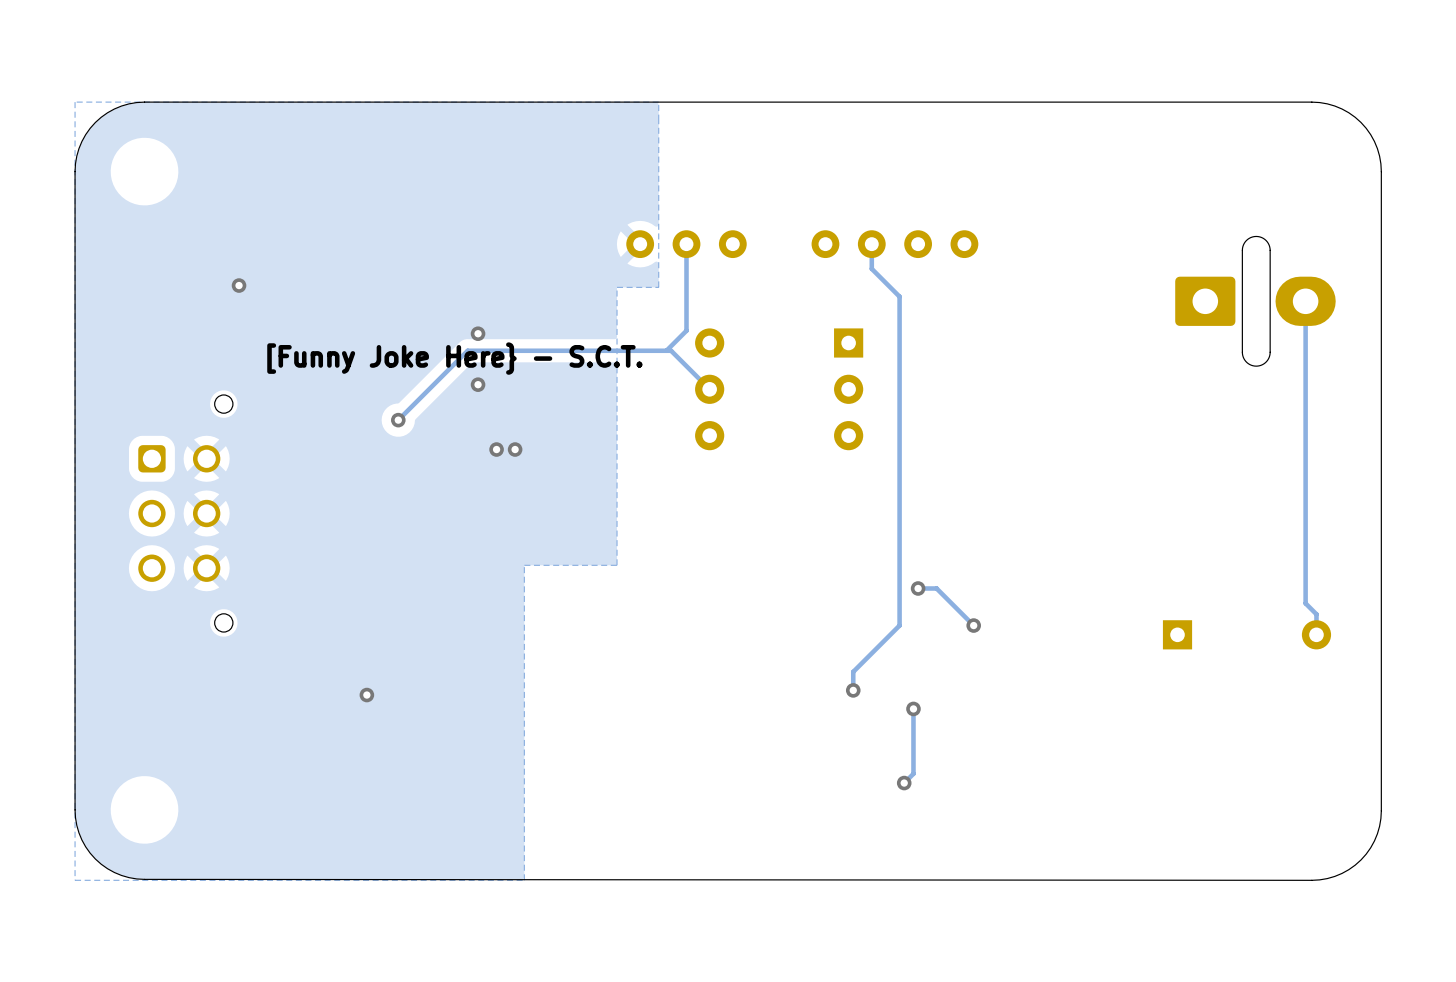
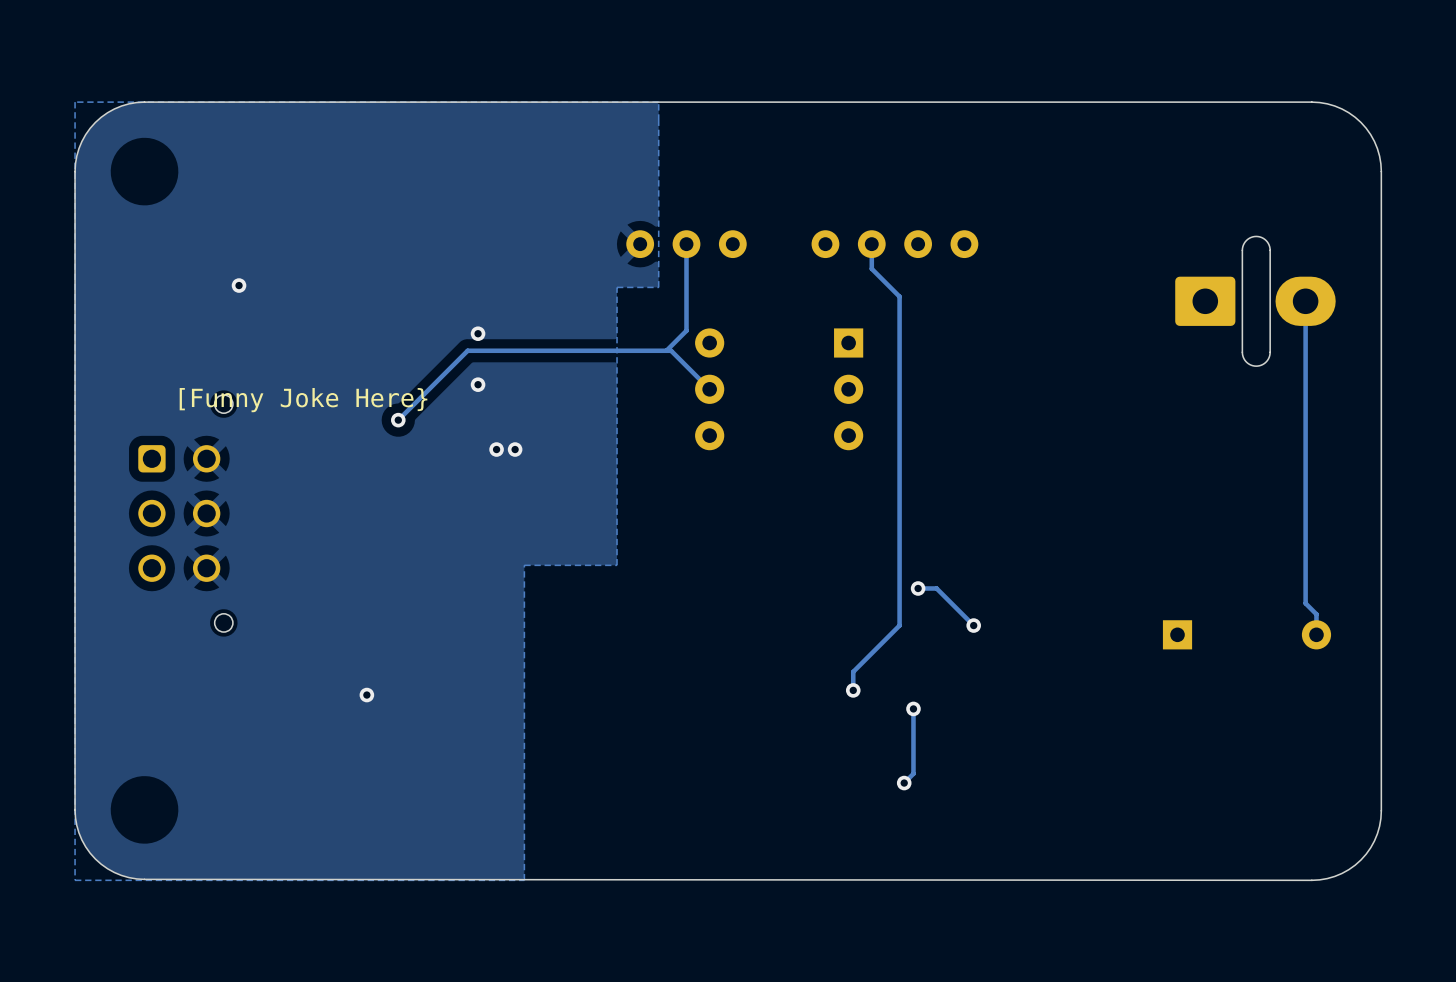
text: [Funny Joke Here} - S.C.T. (454, 358) -> none
text: none -> [Funny Joke Here} (303, 400)

